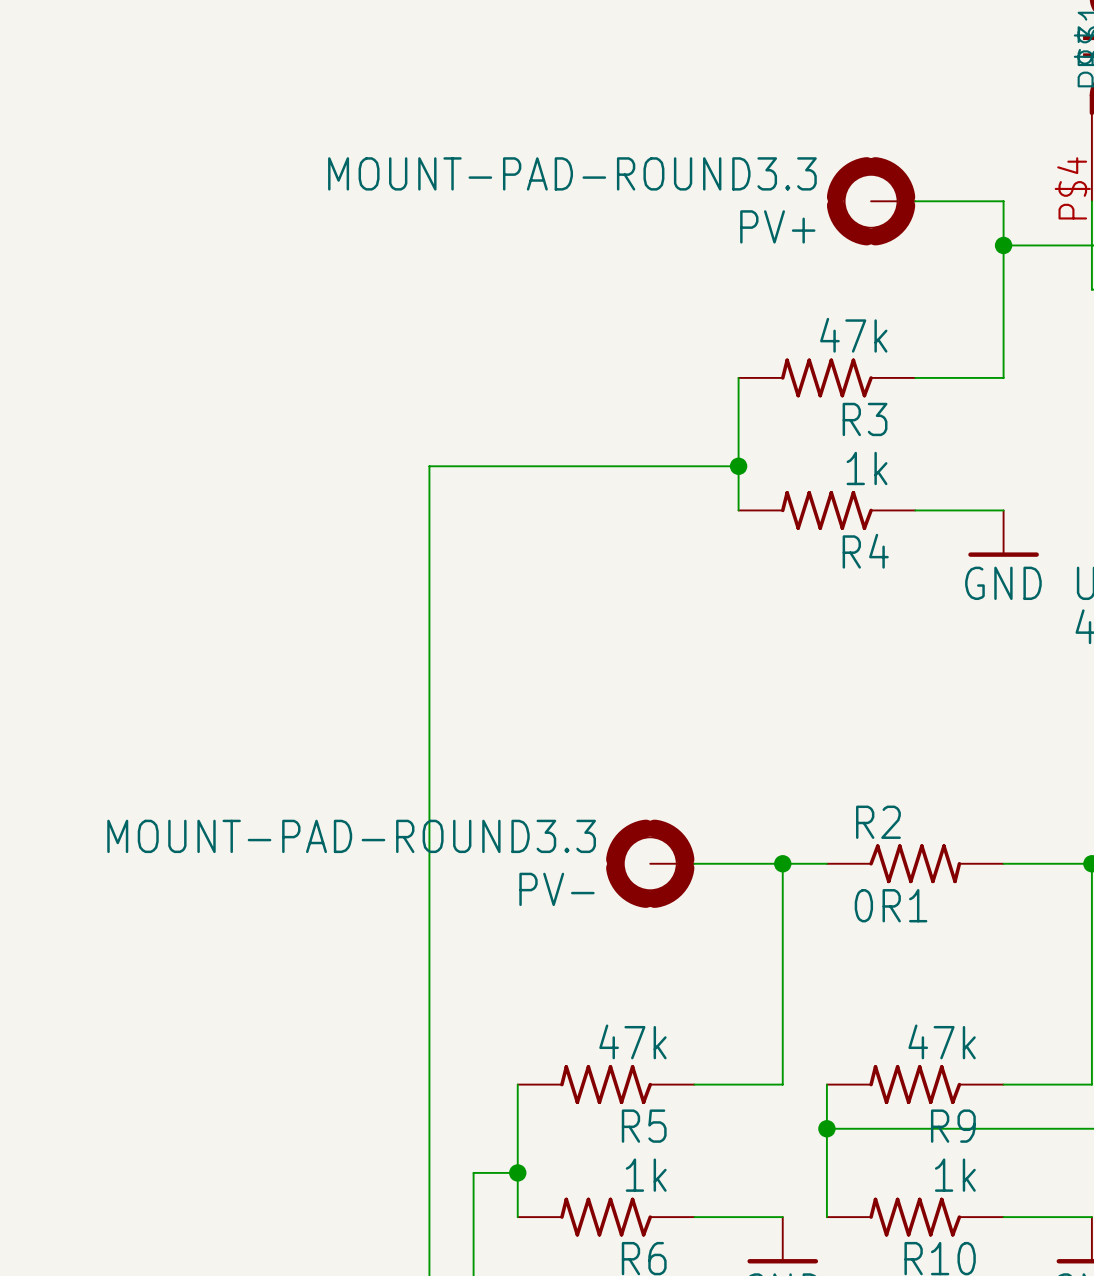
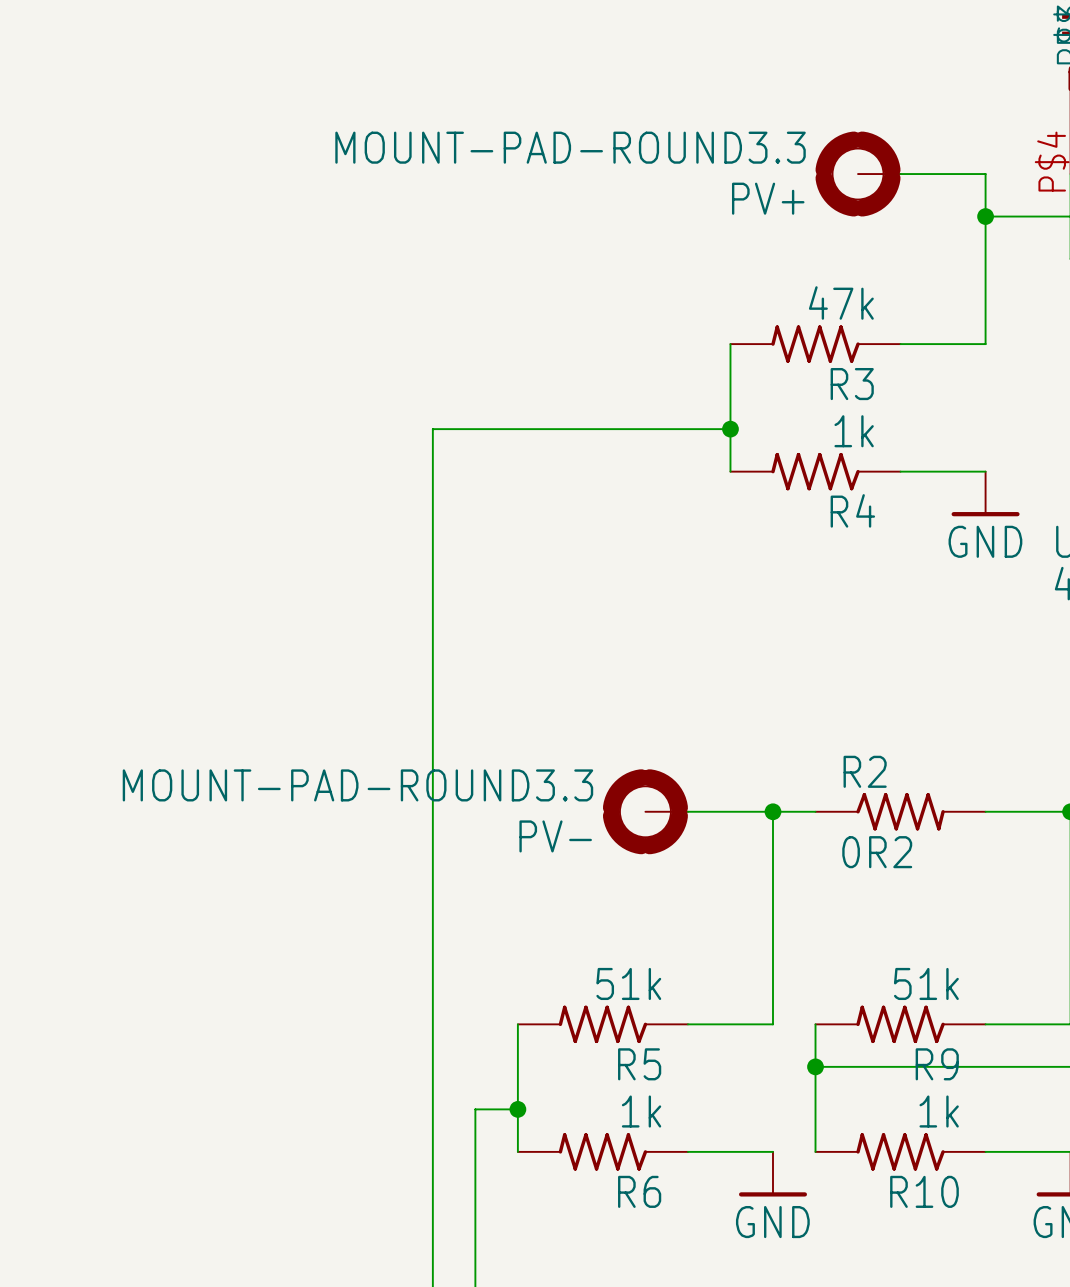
R2 value: 0R1 (891, 905) -> 0R2 (877, 852)
R5 value: 47k (632, 1041) -> 51k (628, 983)
R9 value: 47k (942, 1041) -> 51k (926, 983)

